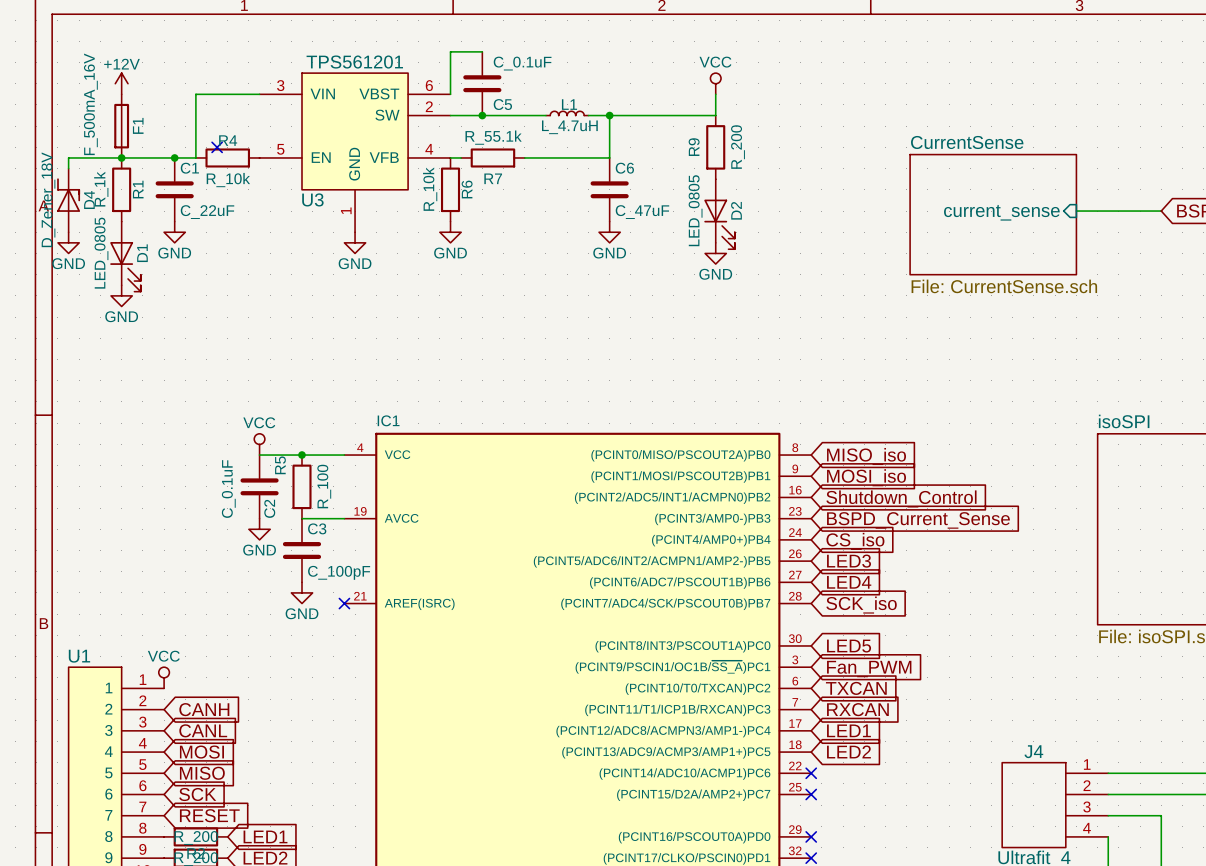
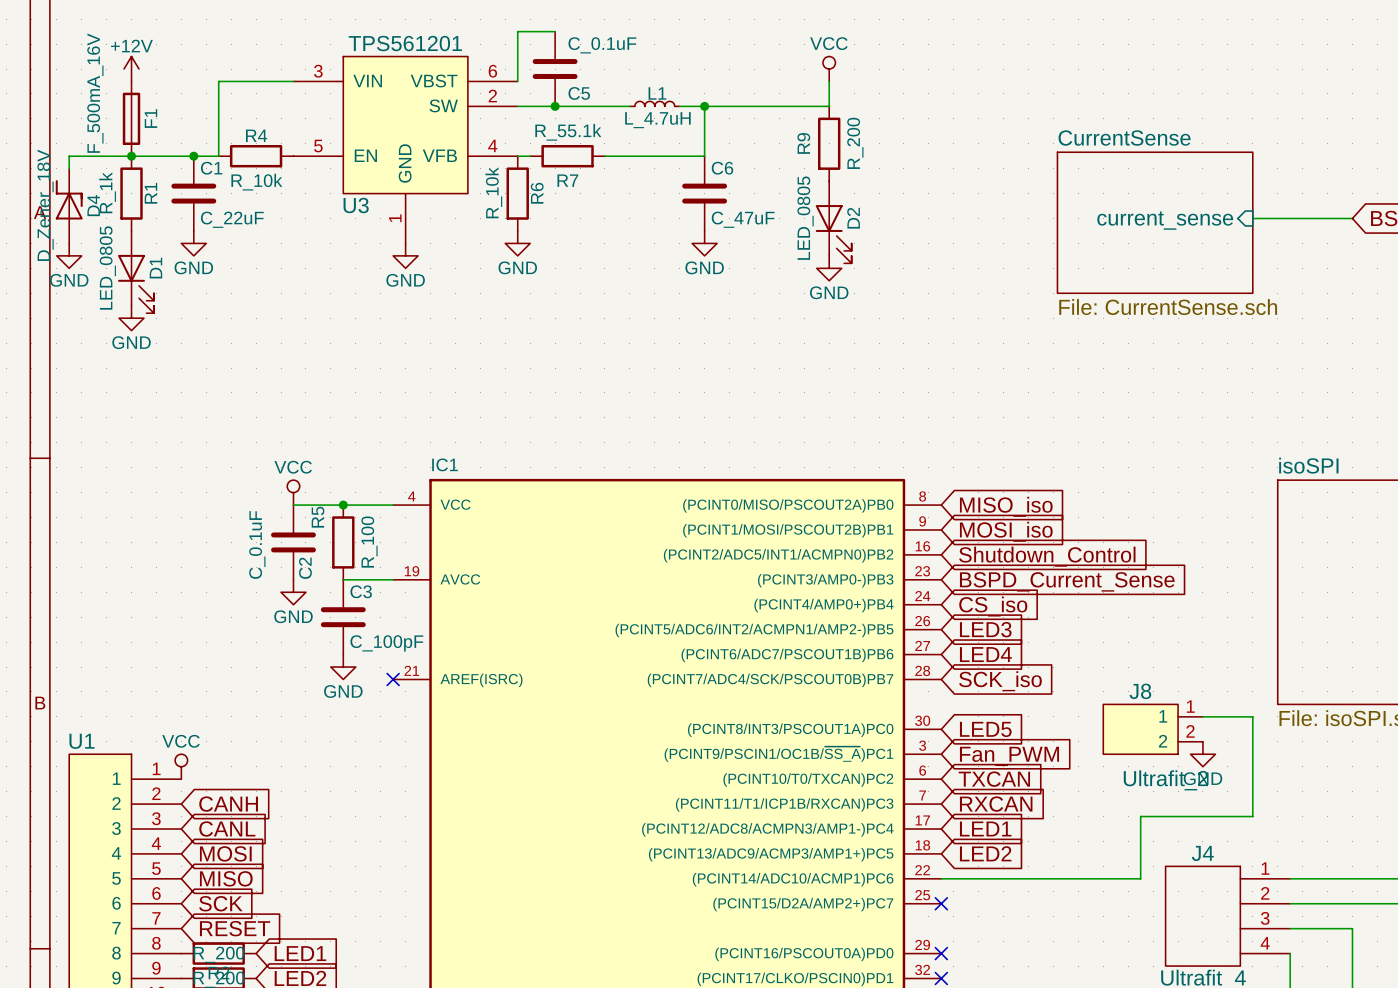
no-connect mark: (217, 147) -> none
wire: none -> (1202, 716) (1252, 716) (1252, 816) (1140, 816) (1140, 878) (941, 878)
J8: none -> Ultrafit_2 (1153, 729)
power symbol: none -> GND (1202, 754)
no-connect mark: (811, 773) -> none

